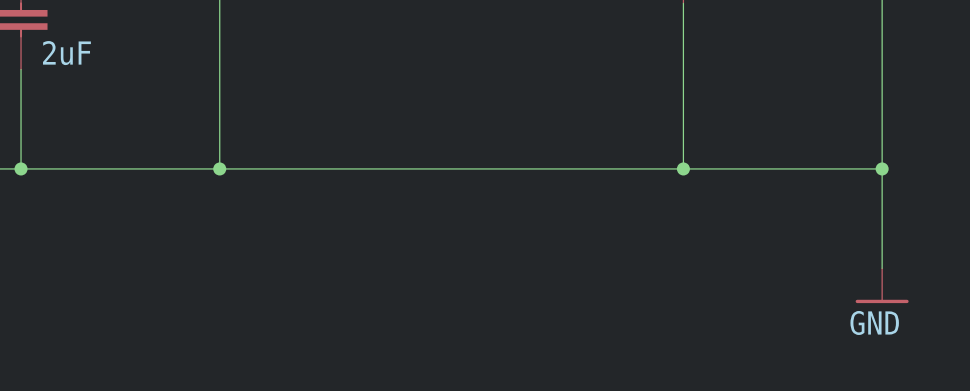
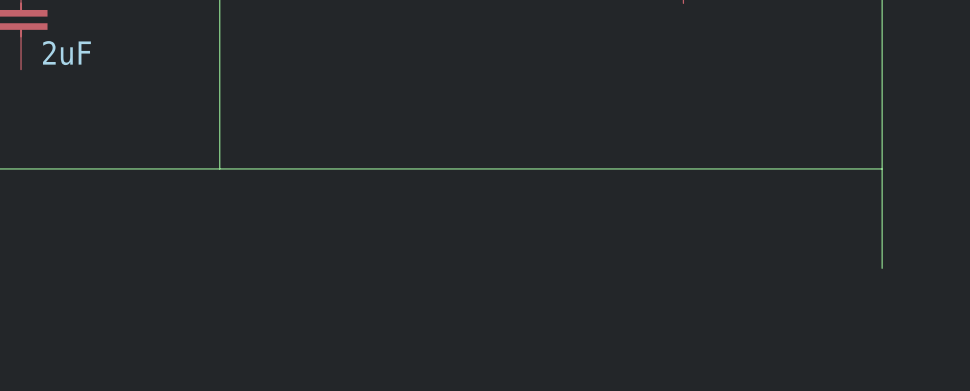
wire: (683, 3) (683, 168) -> none
wire: (21, 69) (21, 168) -> none
junction: (21, 168) -> none
junction: (219, 168) -> none
junction: (683, 168) -> none
junction: (882, 168) -> none
power symbol: GND (882, 285) -> none

